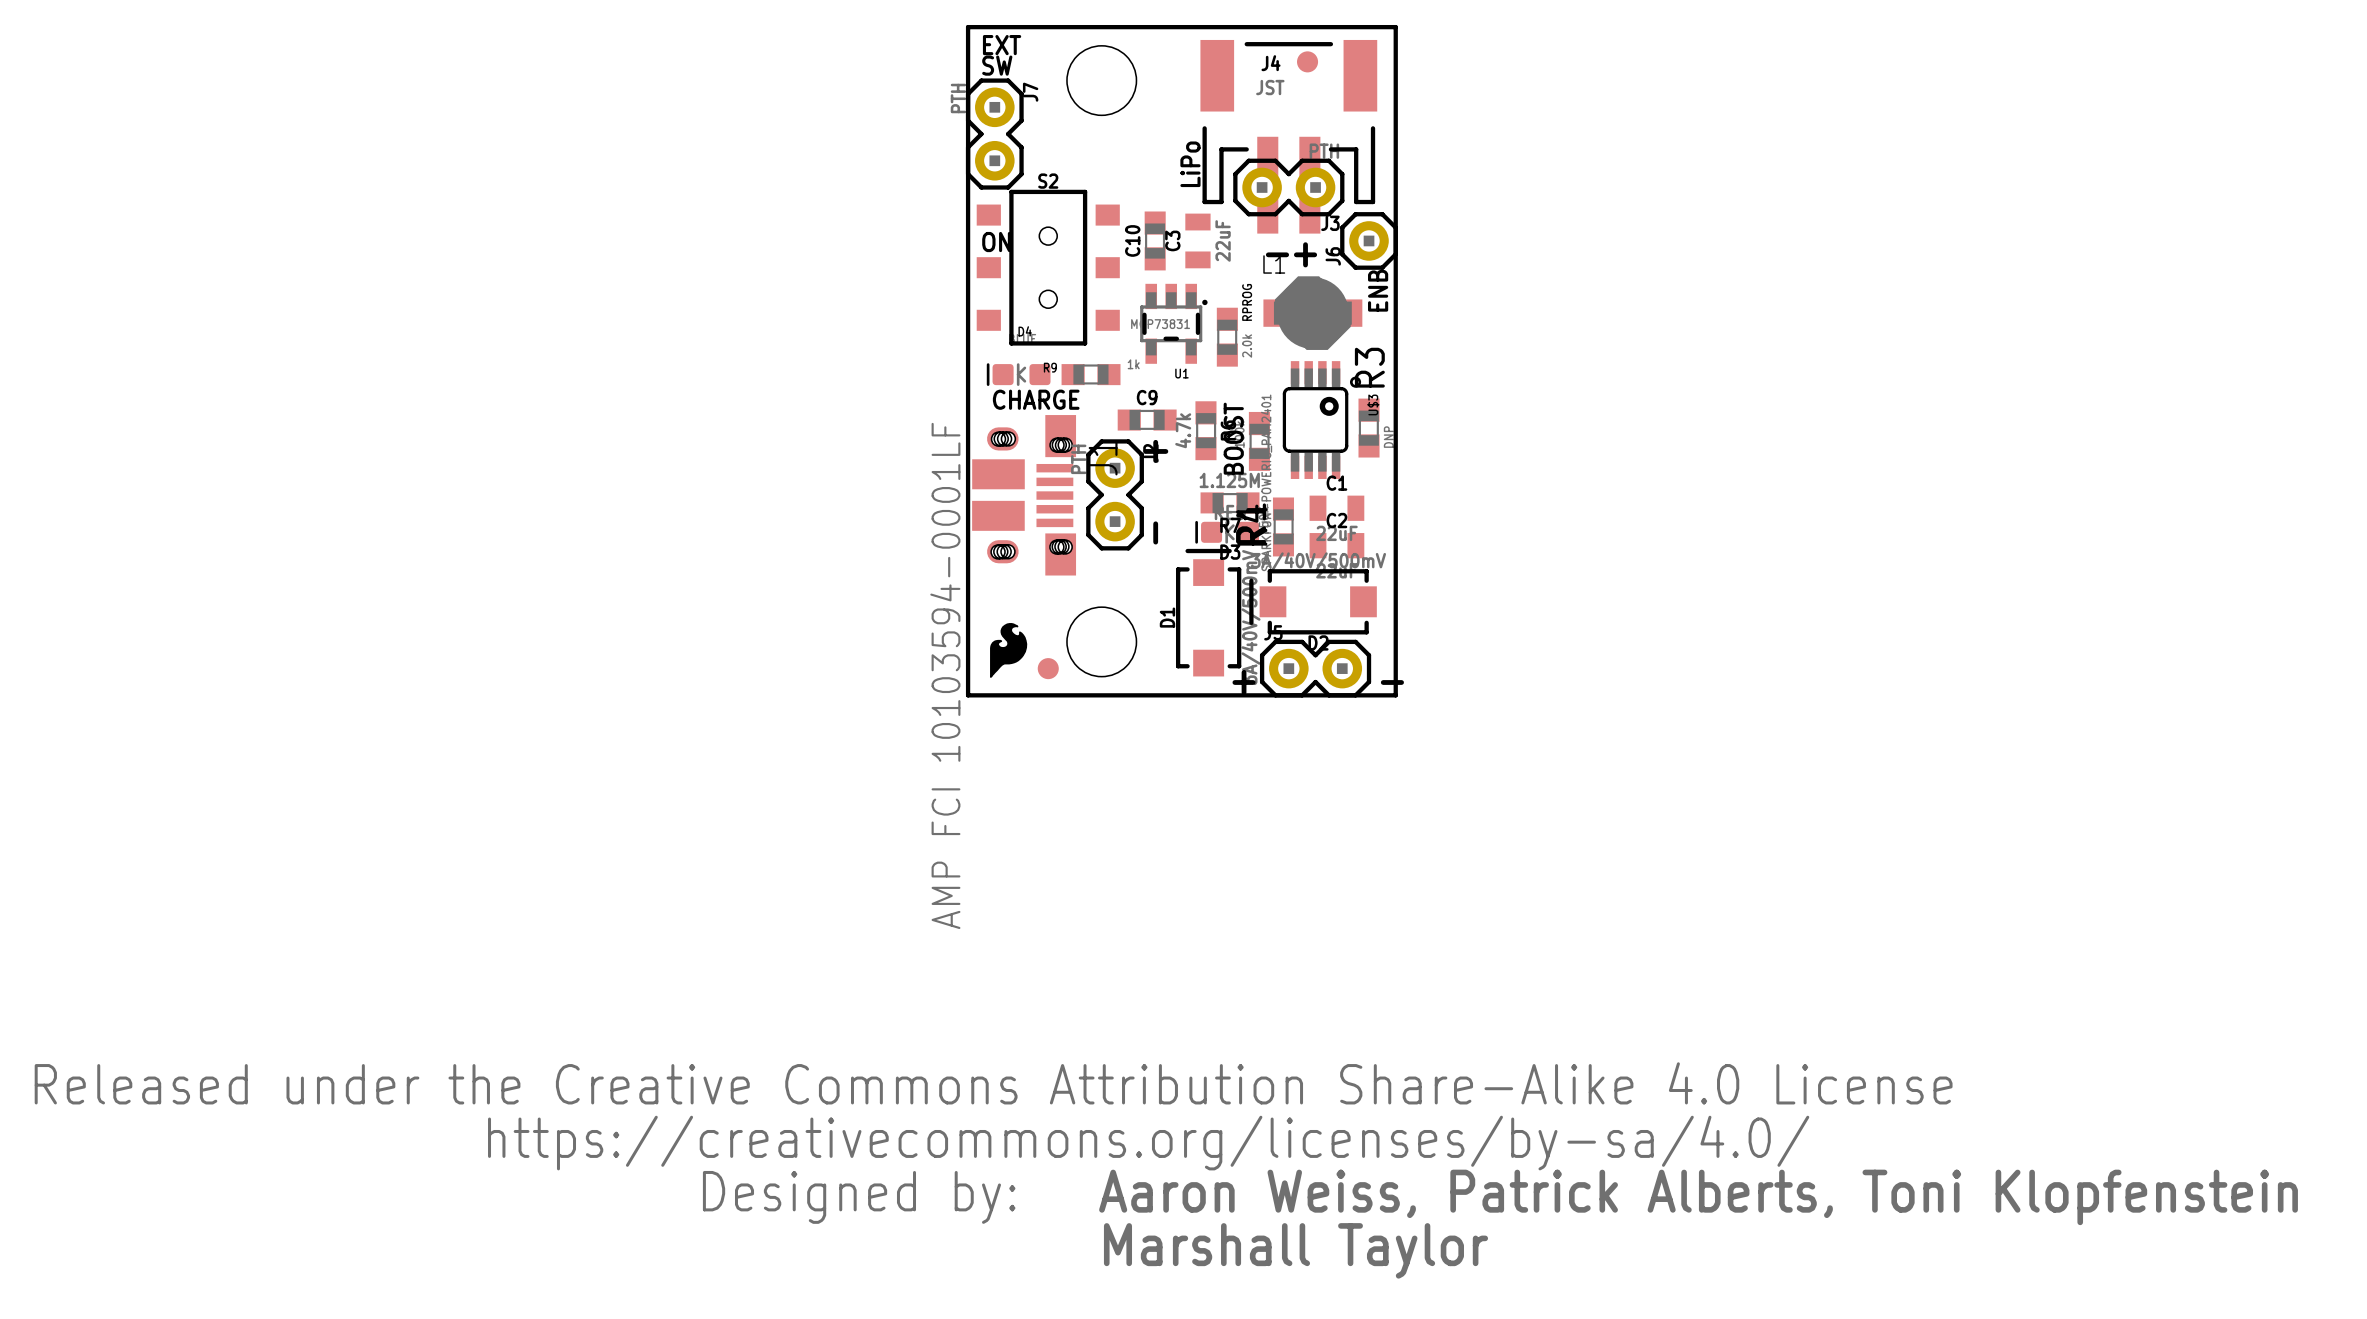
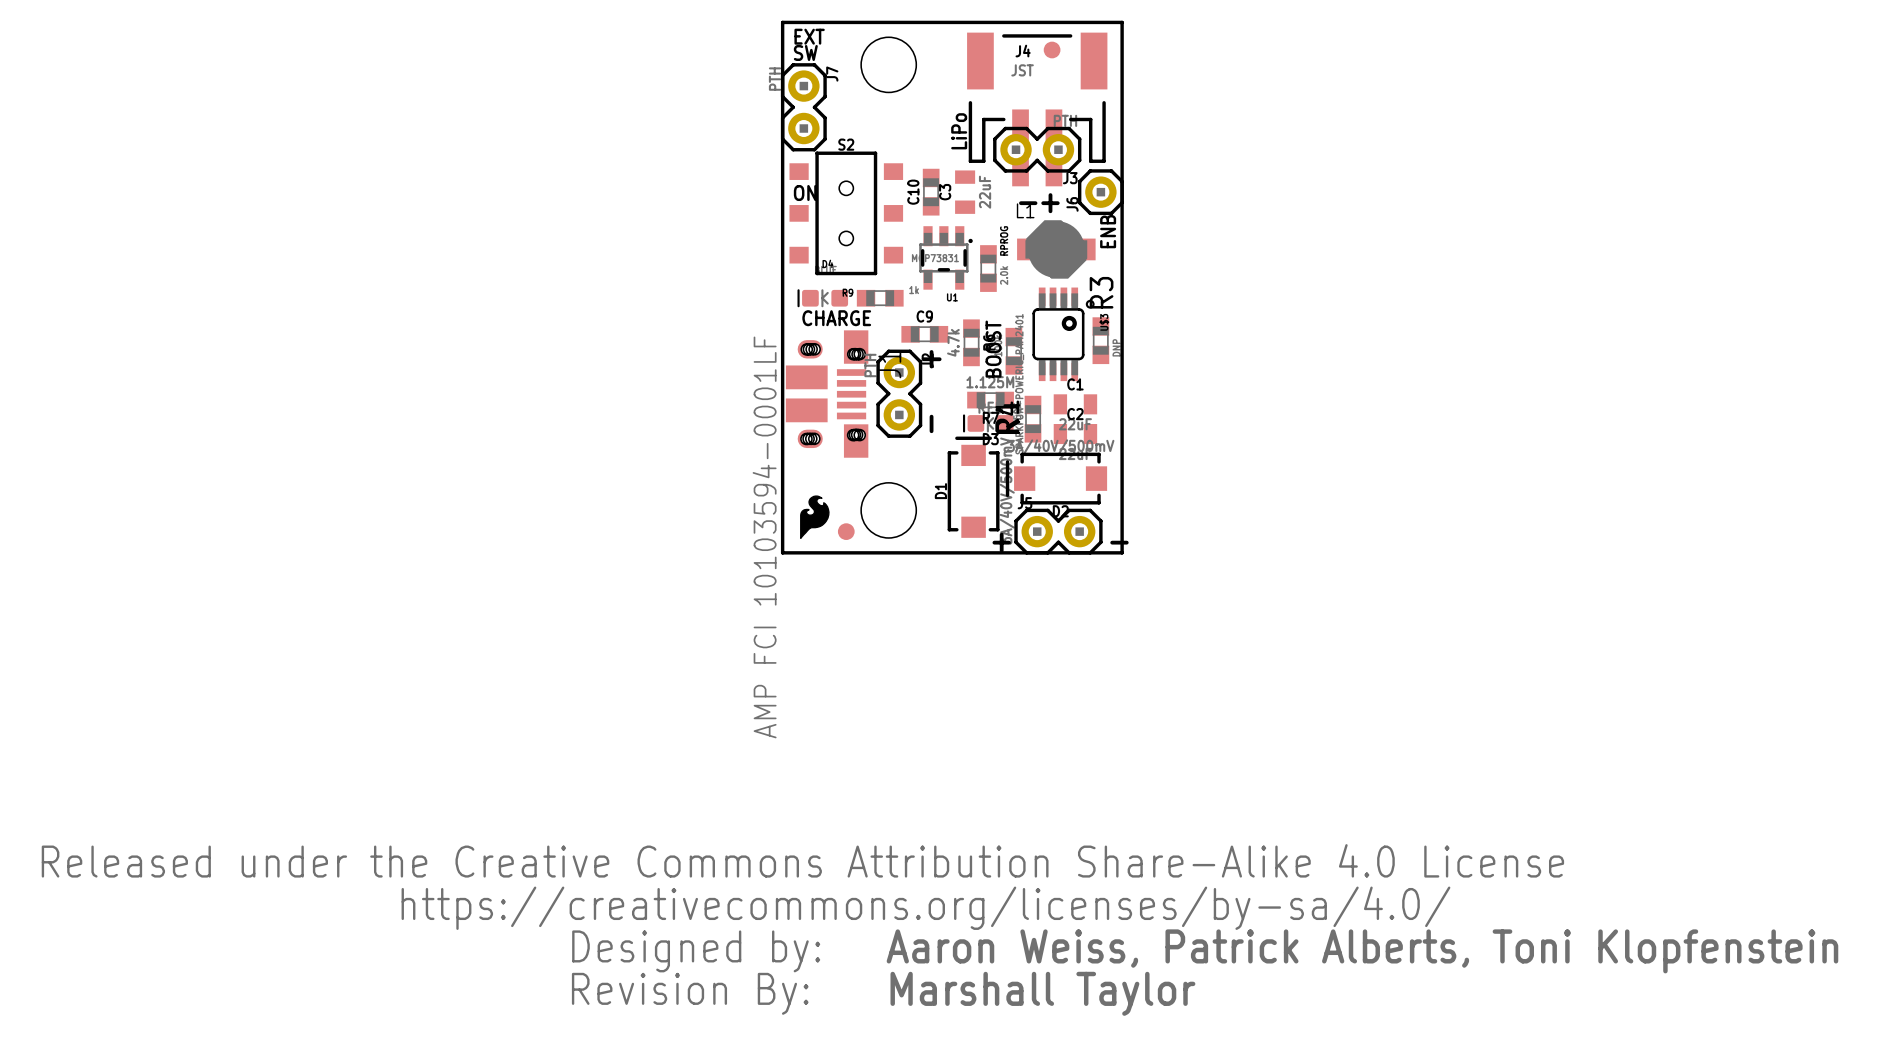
drawing: none -> [571, 972, 809, 1015]

